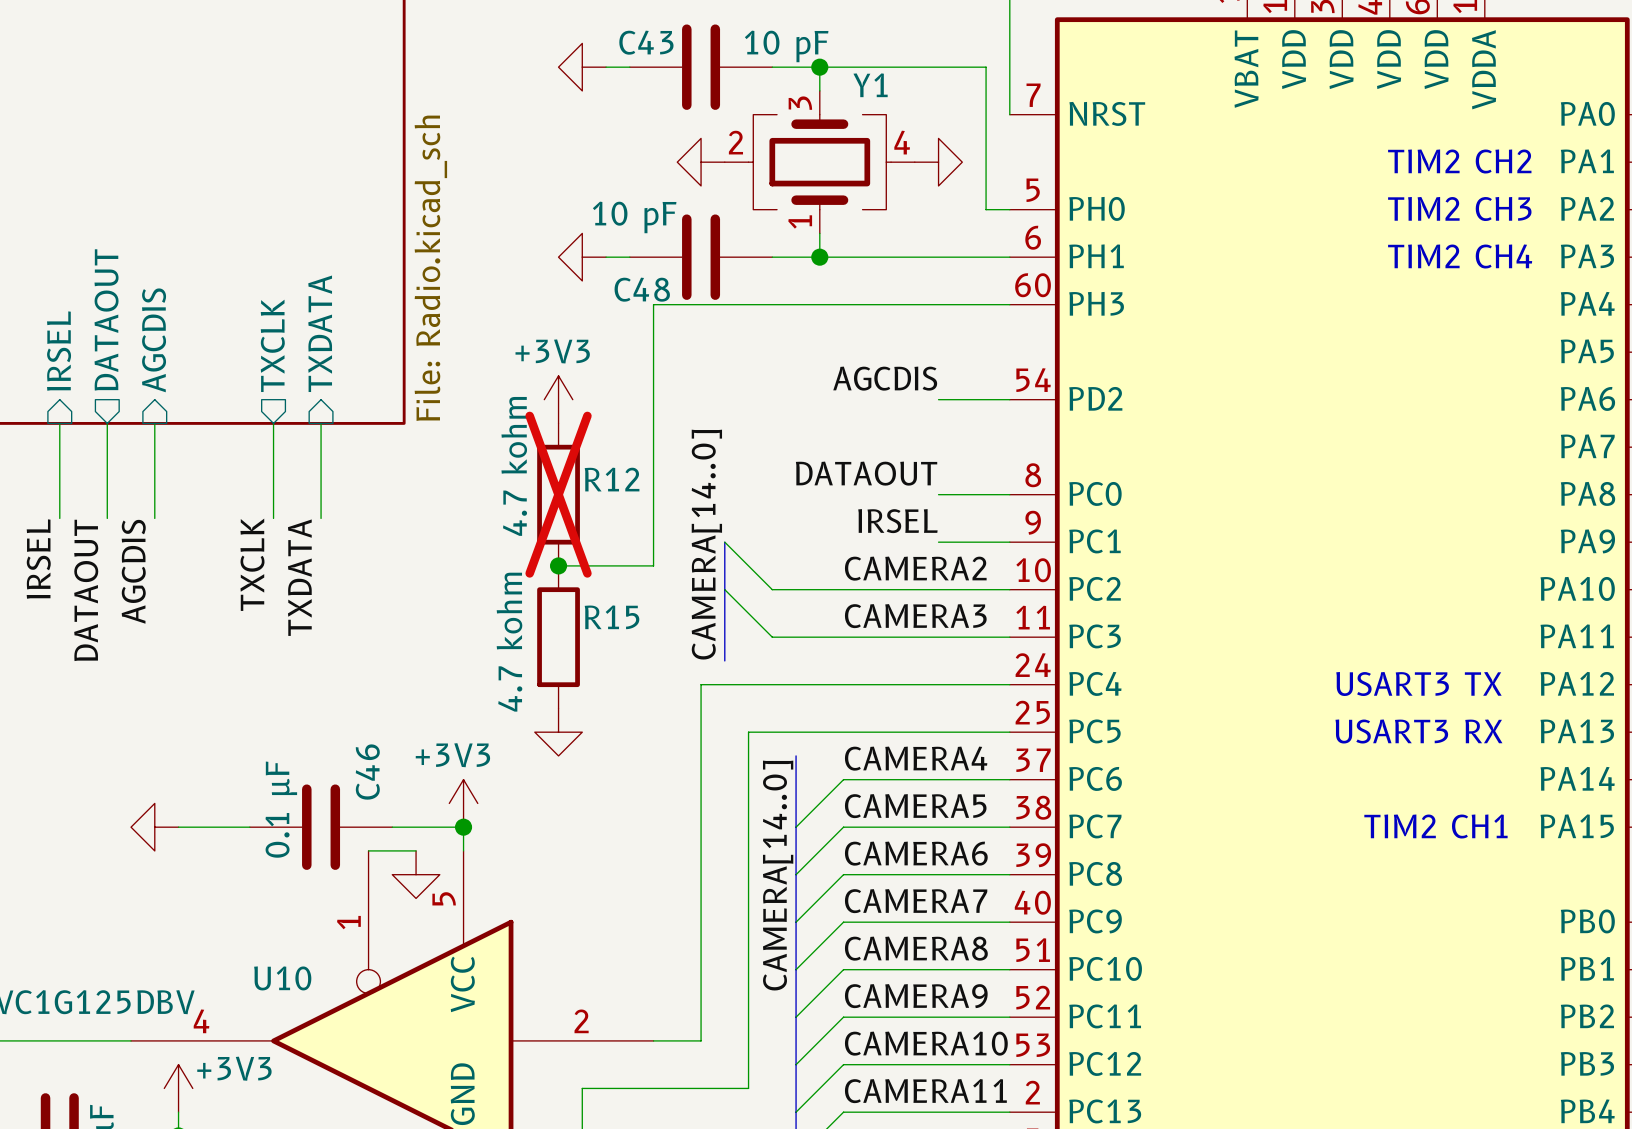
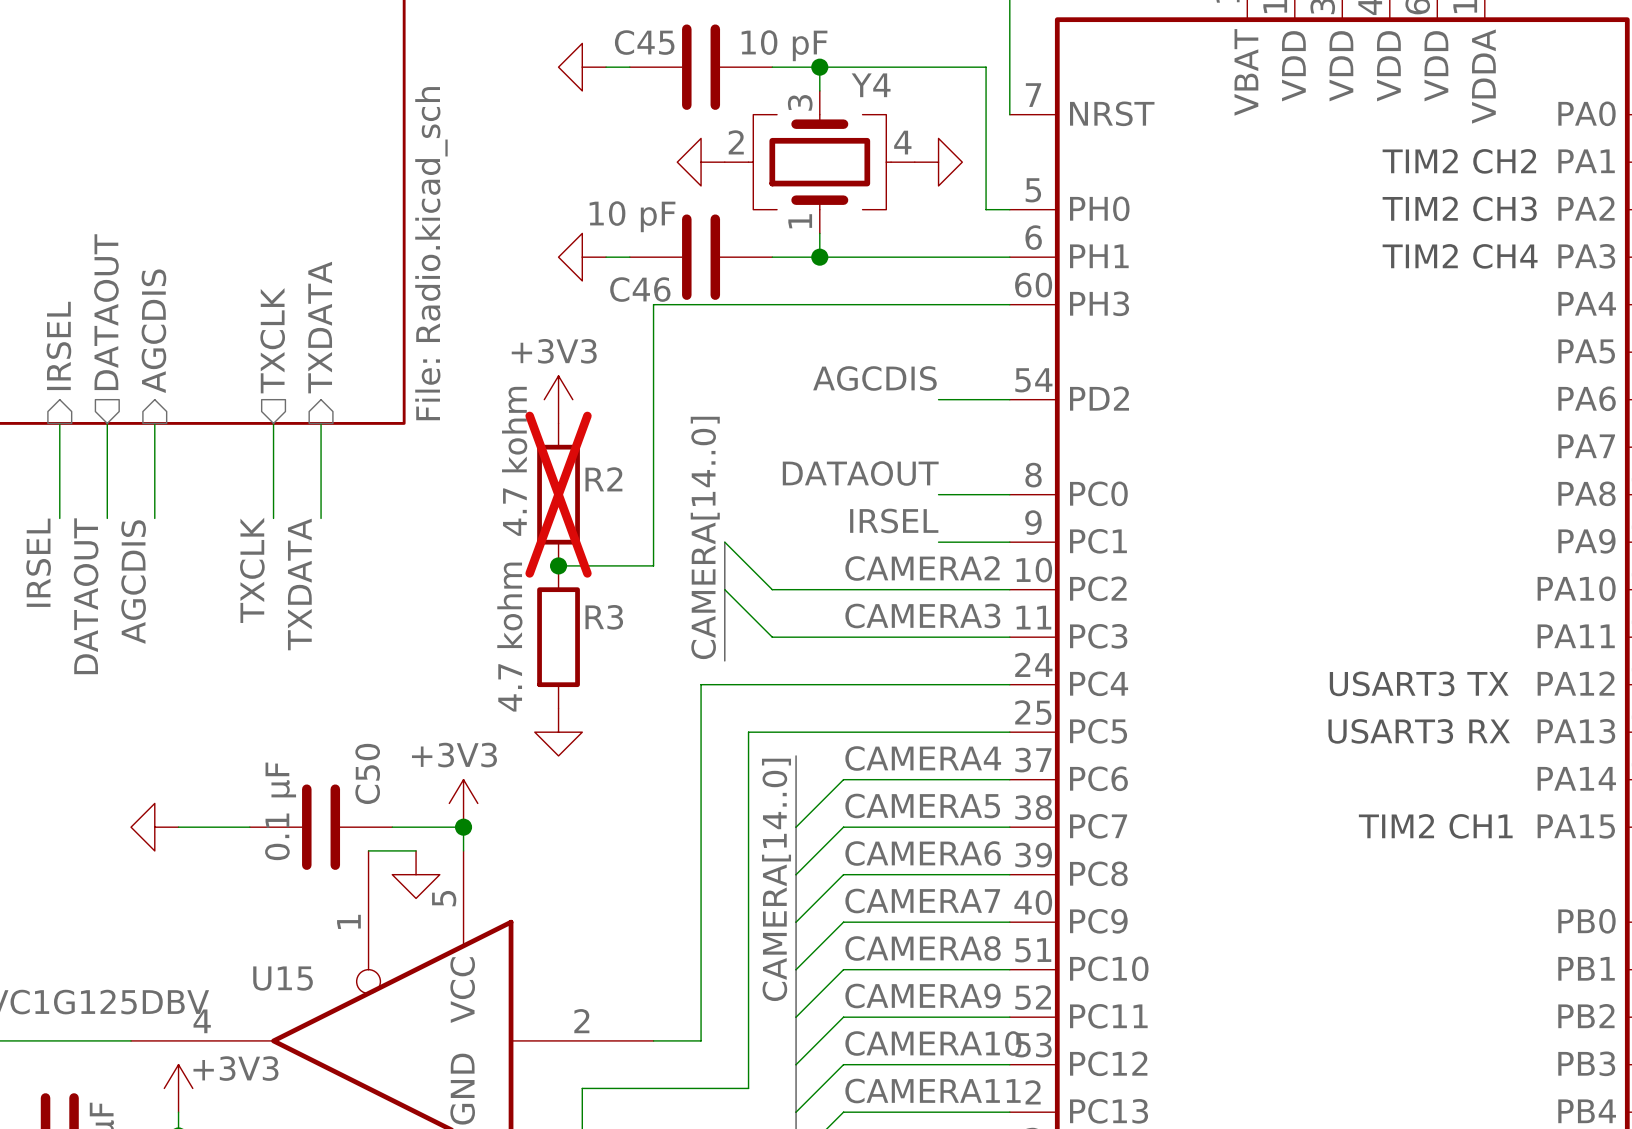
C43 name: C43 (646, 42) -> C45 (644, 42)
Y1 name: Y1 (870, 85) -> Y4 (871, 85)
C48 name: C48 (642, 289) -> C46 (640, 289)
R12 name: R12 (612, 479) -> R2 (603, 479)
R15 name: R15 (612, 617) -> R3 (604, 617)
C46 name: C46 (367, 772) -> C50 (367, 773)
U10 name: U10 (282, 978) -> U15 (283, 978)

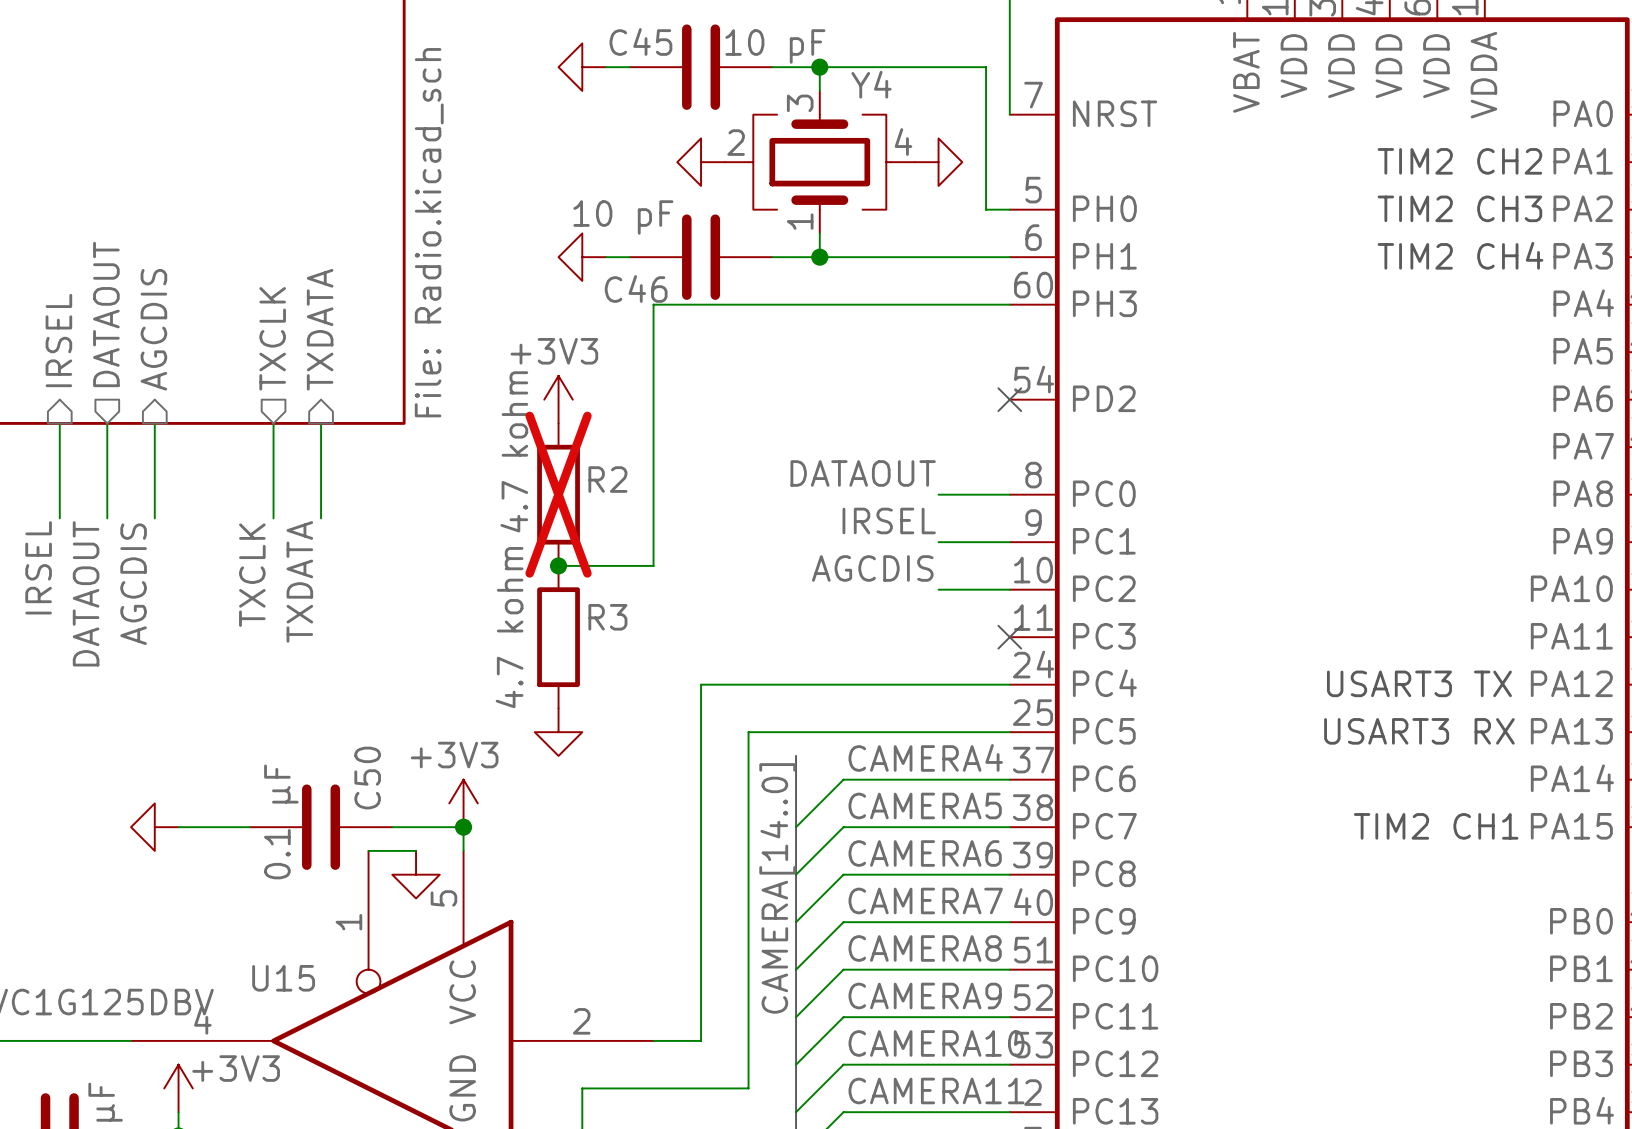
label position: AGCDIS (874, 378) -> AGCDIS (872, 568)
wire: (938, 399) (1009, 399) -> none
no-connect mark: none -> (1009, 399)
label: CAMERA[14..0] (705, 537) -> none
wire: (724, 542) (772, 589) (938, 589) -> none
bus: (724, 542) (724, 660) -> none
label: CAMERA2 (922, 568) -> none
wire: (724, 589) (772, 637) (1009, 637) -> none
label: CAMERA3 (922, 616) -> none
no-connect mark: none -> (1009, 637)

